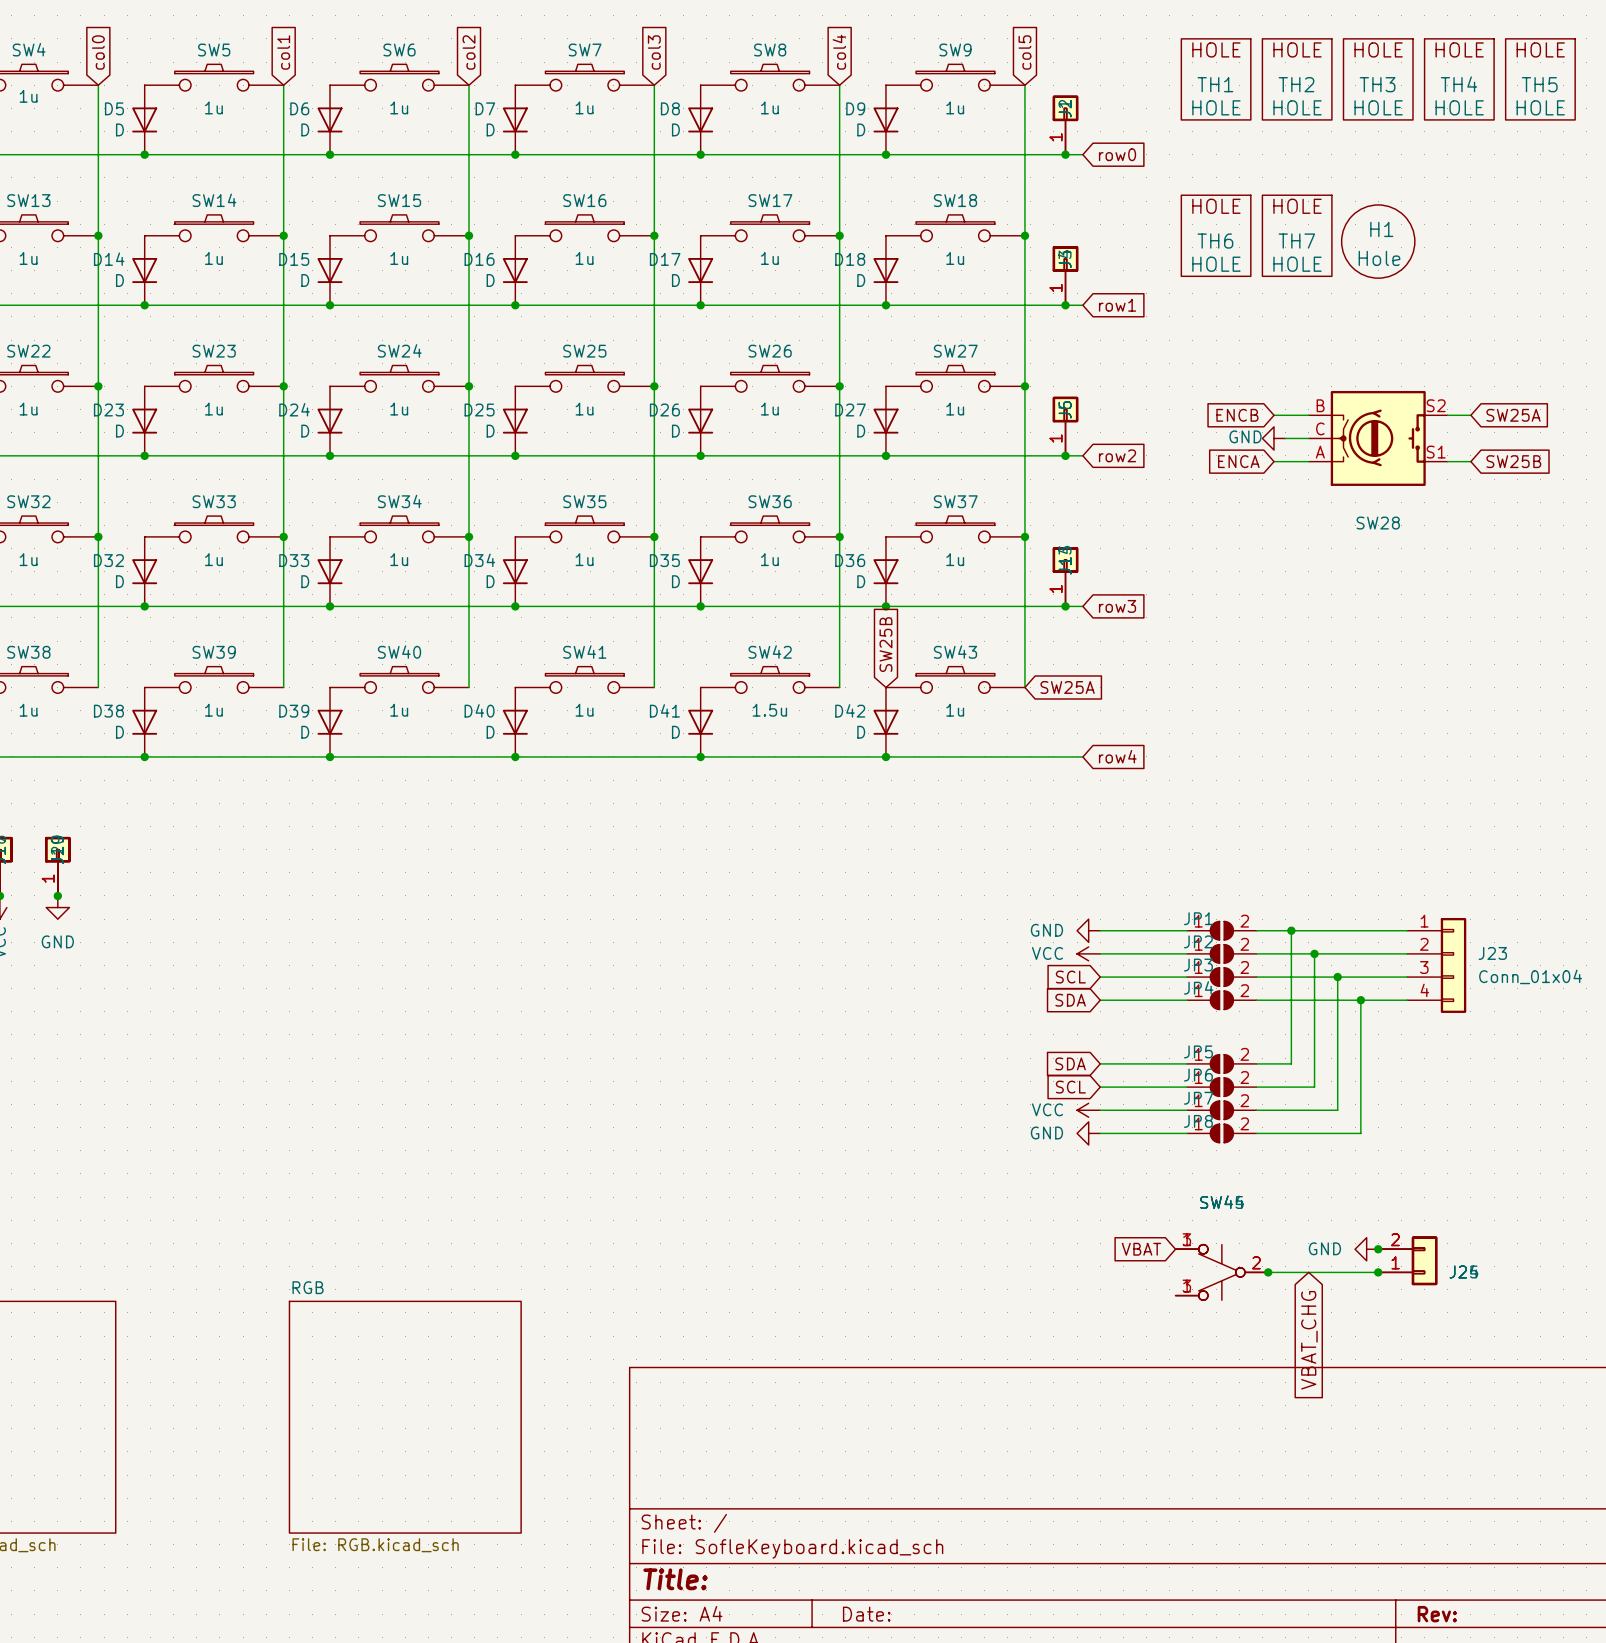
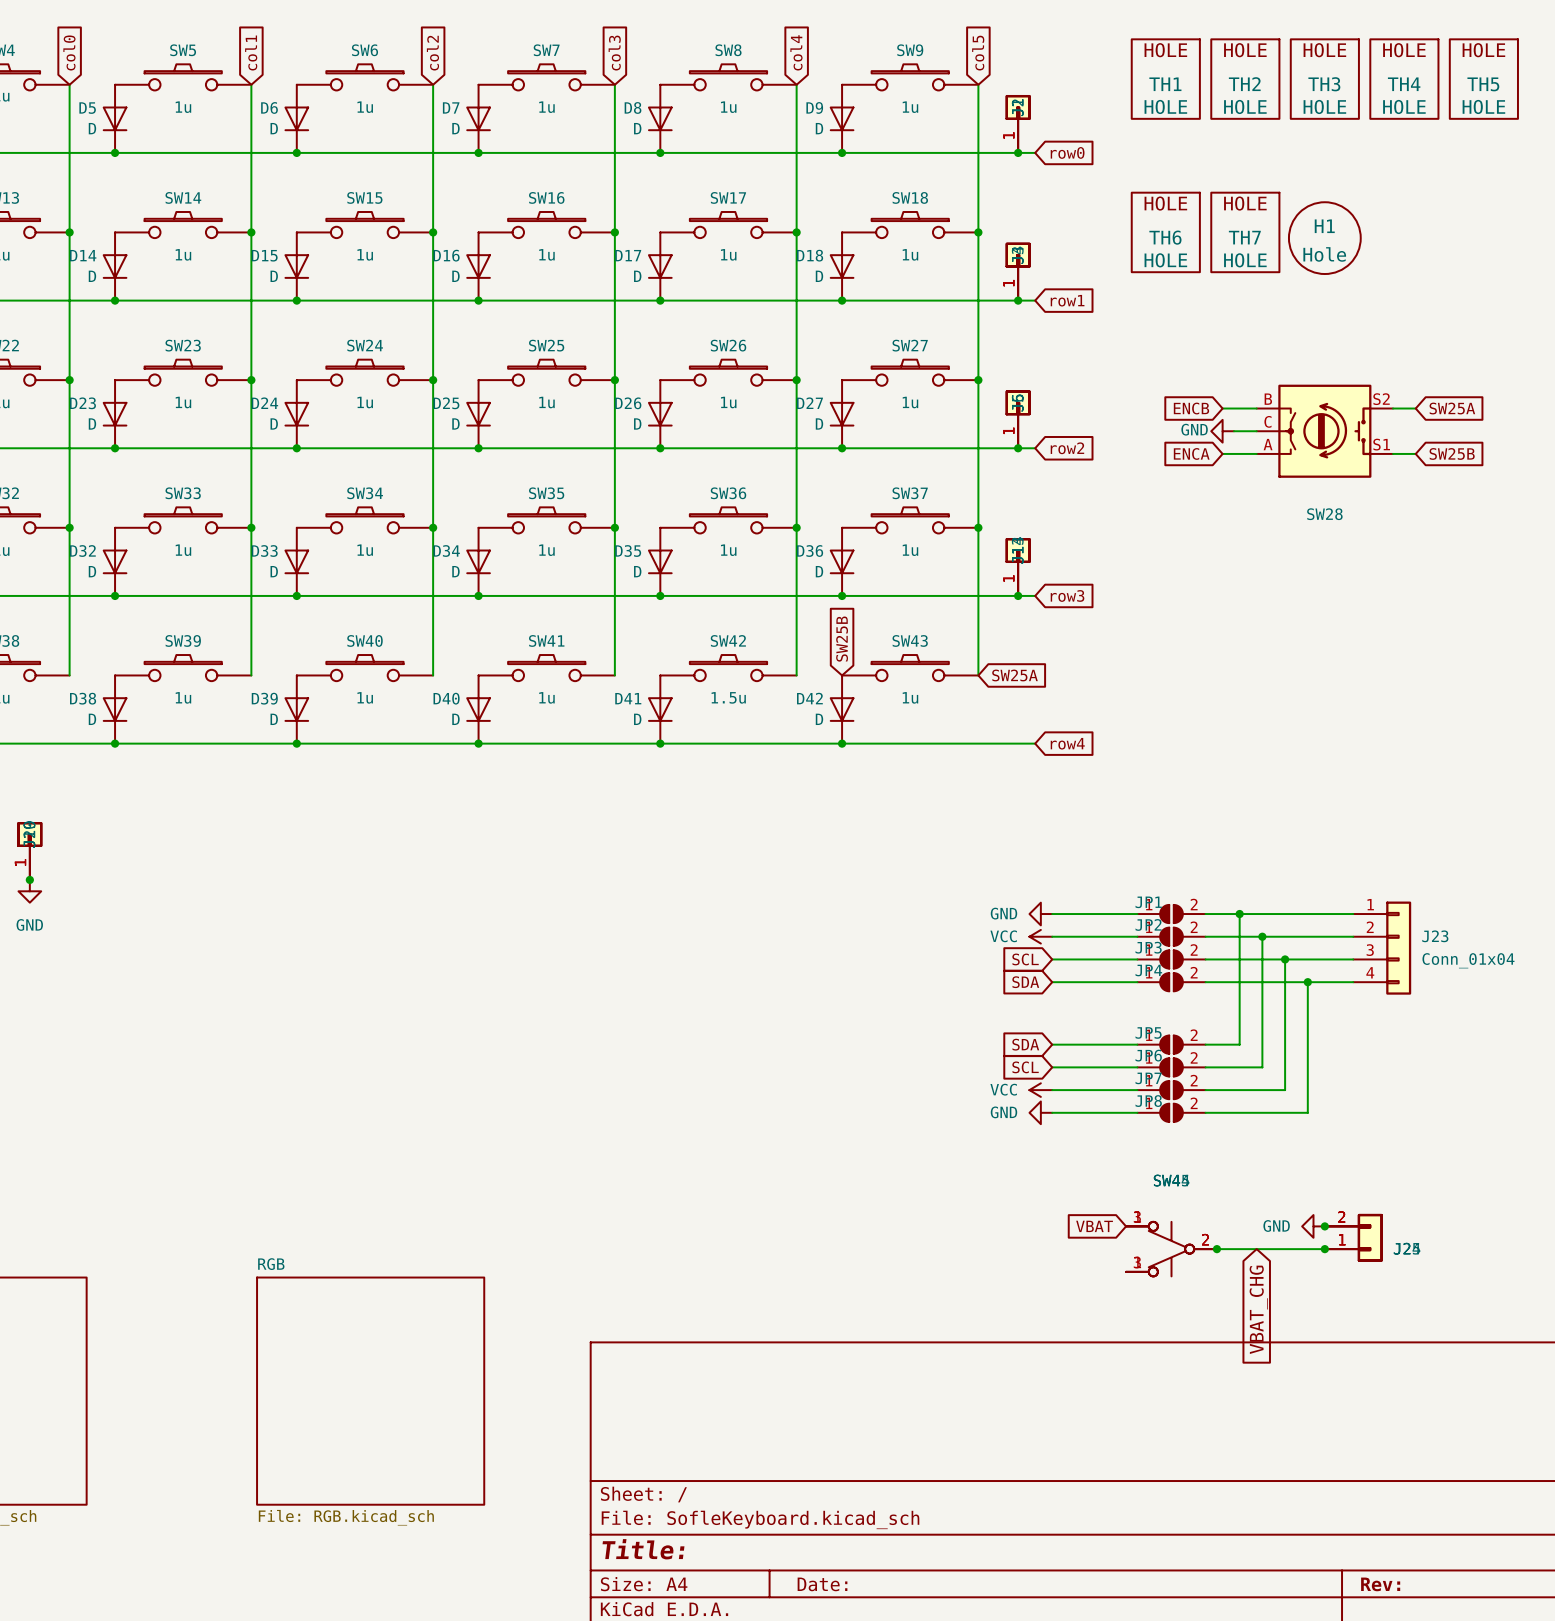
SW28 symbol: [1308, 390, 1448, 486] -> [1256, 384, 1394, 478]

